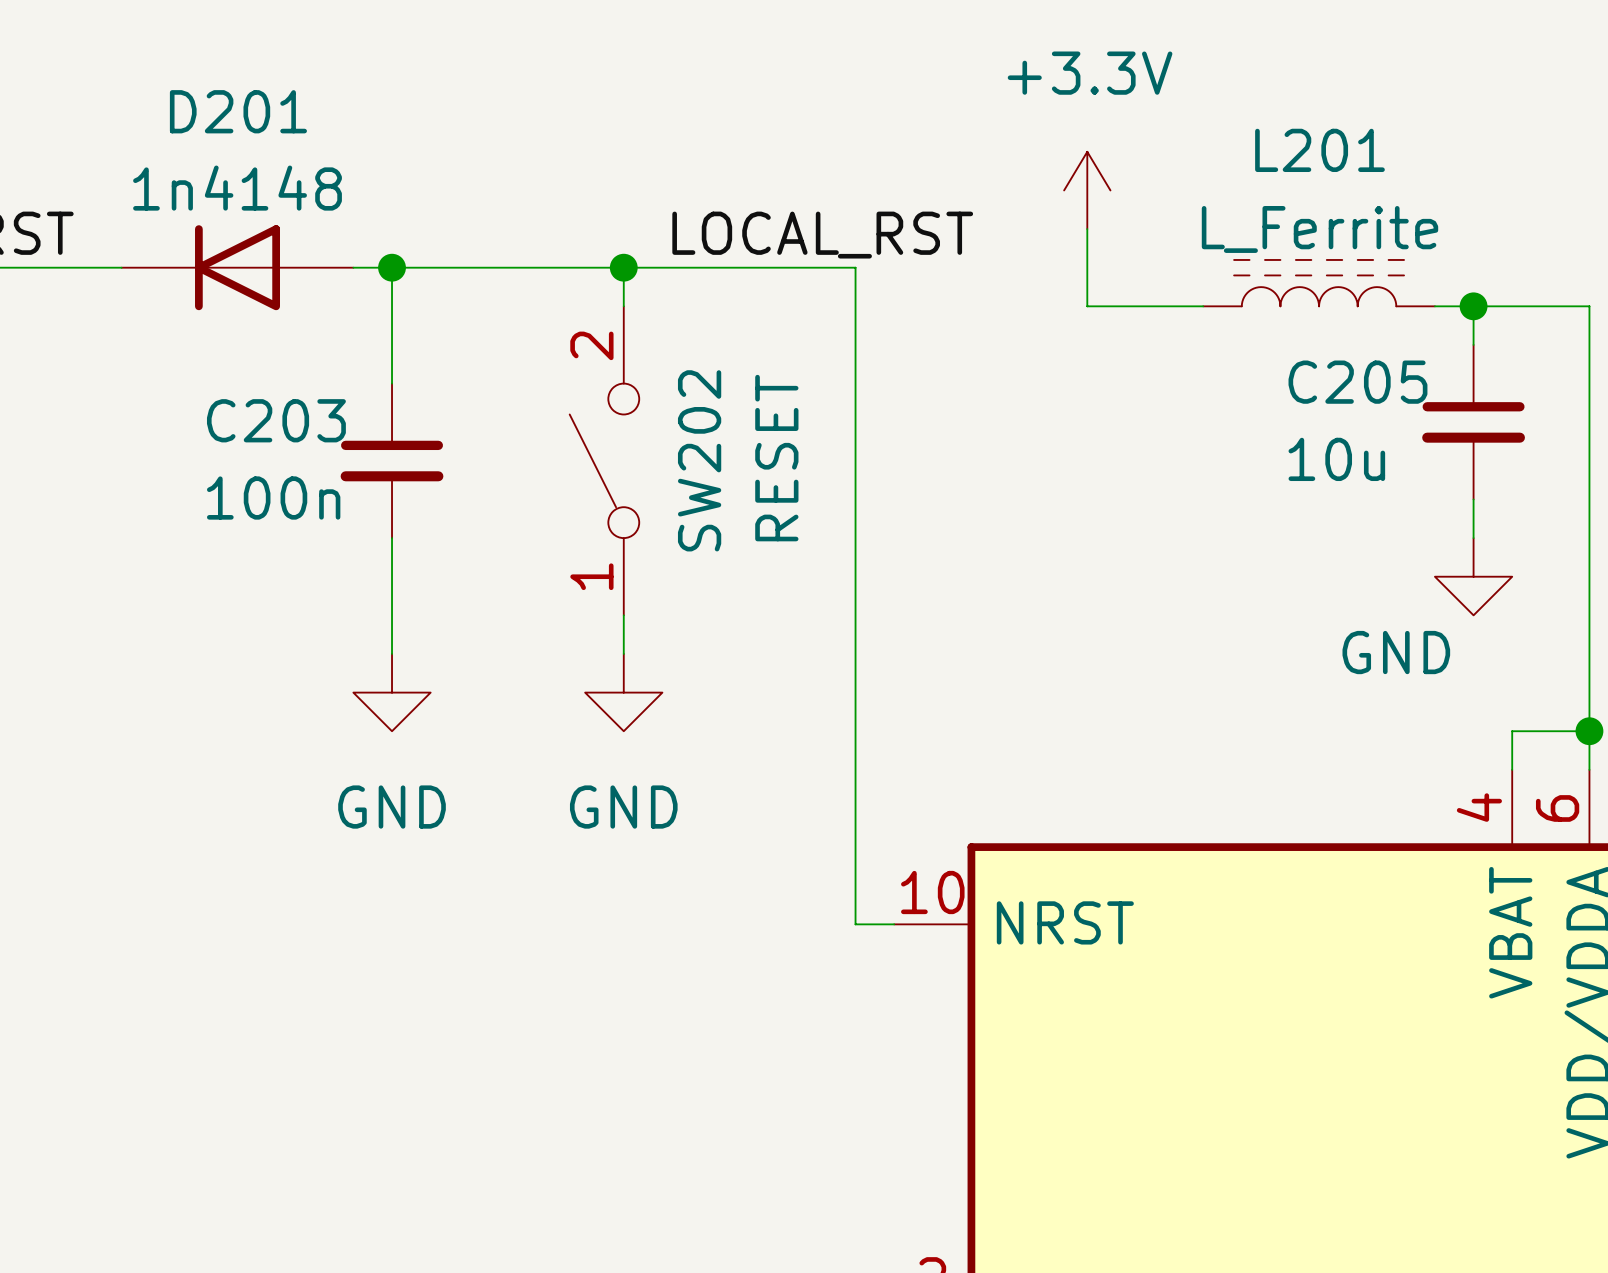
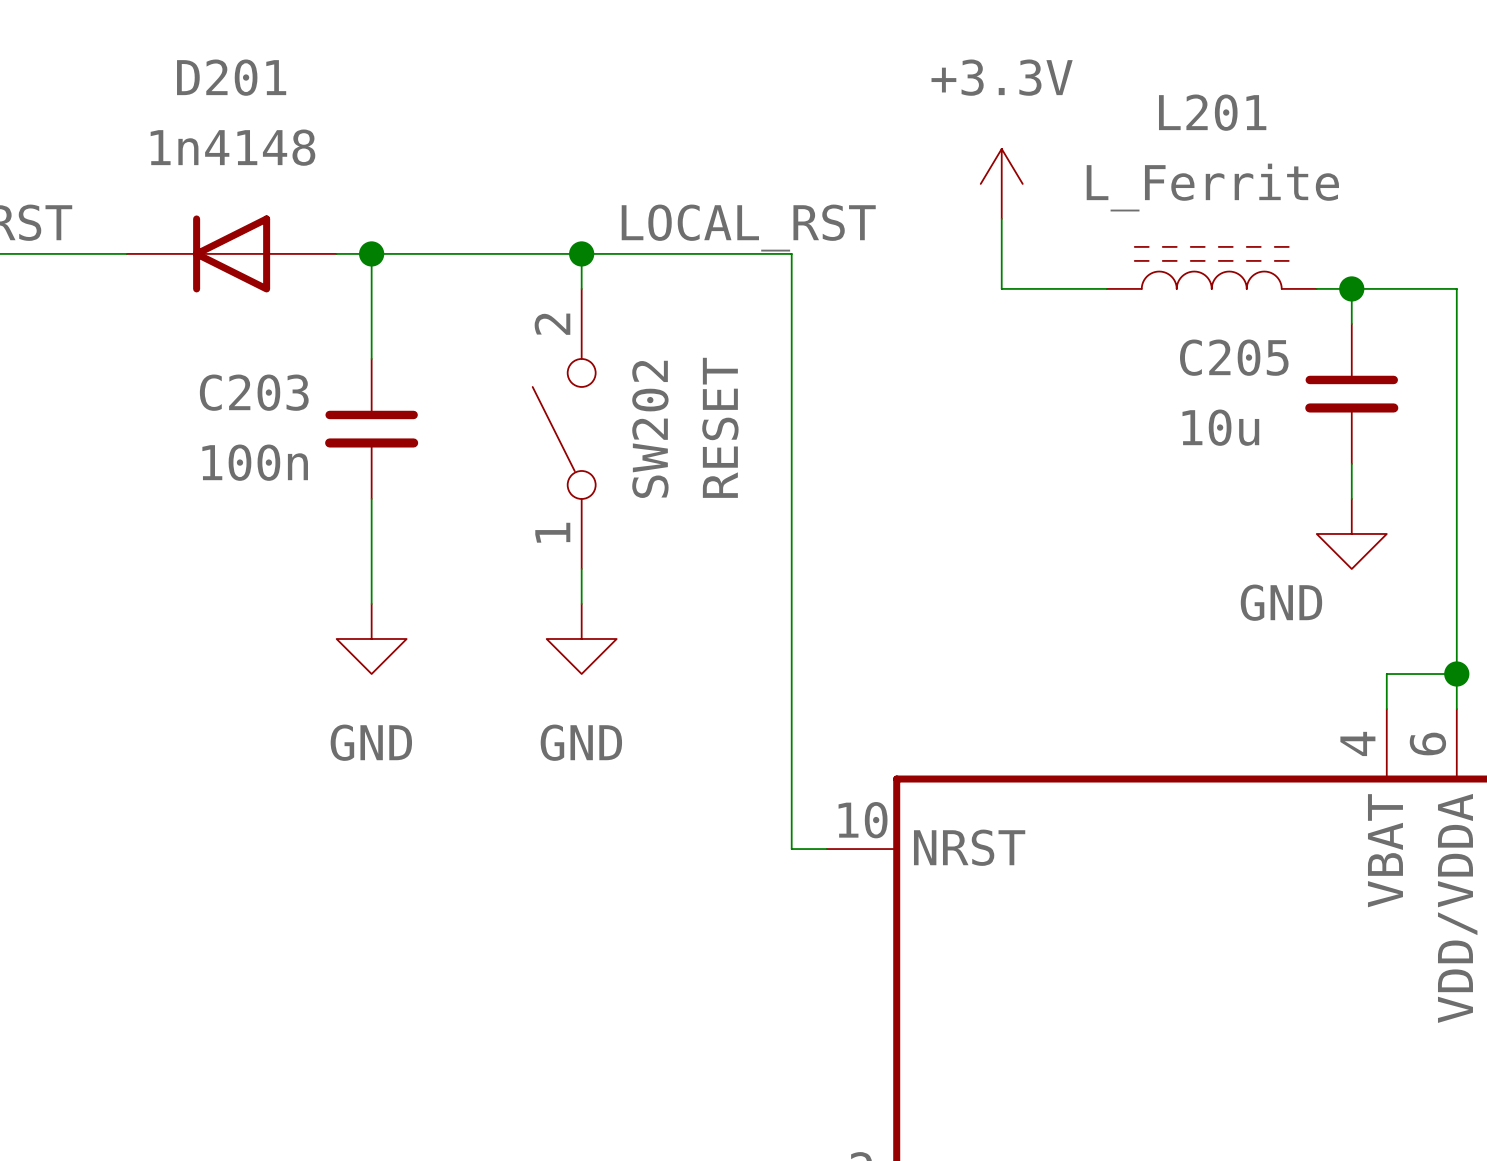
D201 name position: D201 (238, 111) -> D201 (231, 77)
L201 name position: L201 (1319, 150) -> L201 (1212, 112)
D201 value position: 1n4148 (237, 188) -> 1n4148 (232, 147)
L201 value position: L_Ferrite (1319, 229) -> L_Ferrite (1212, 187)

